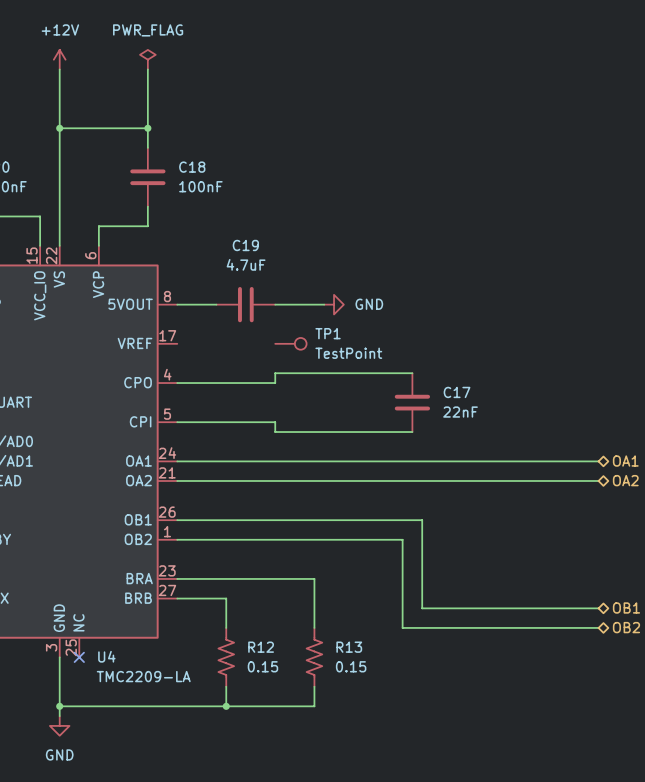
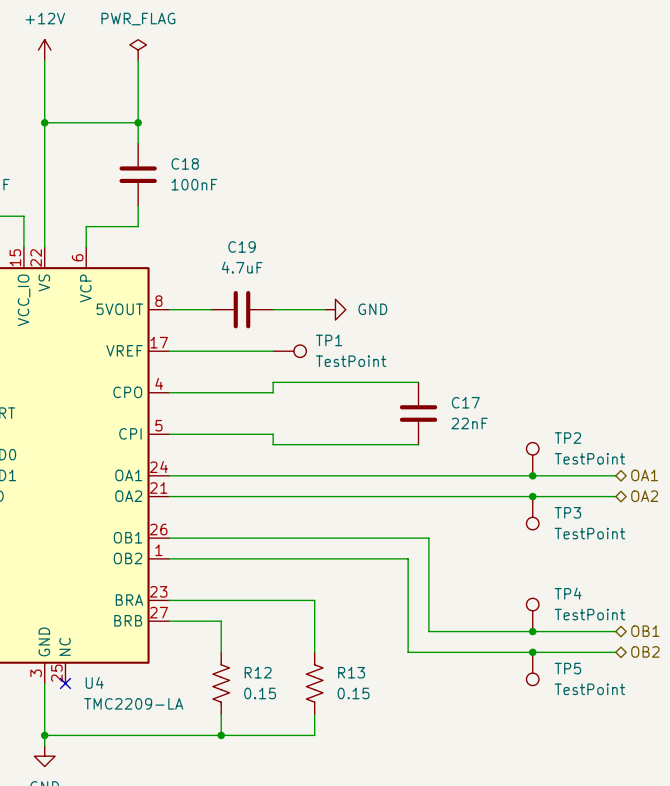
wire: none -> (169, 351) (273, 351)
TP2: none -> TestPoint (532, 459)
junction: none -> (532, 475)
junction: none -> (532, 496)
TP3: none -> TestPoint (532, 513)
TP4: none -> TestPoint (532, 614)
junction: none -> (532, 631)
junction: none -> (532, 652)
TP5: none -> TestPoint (532, 668)

